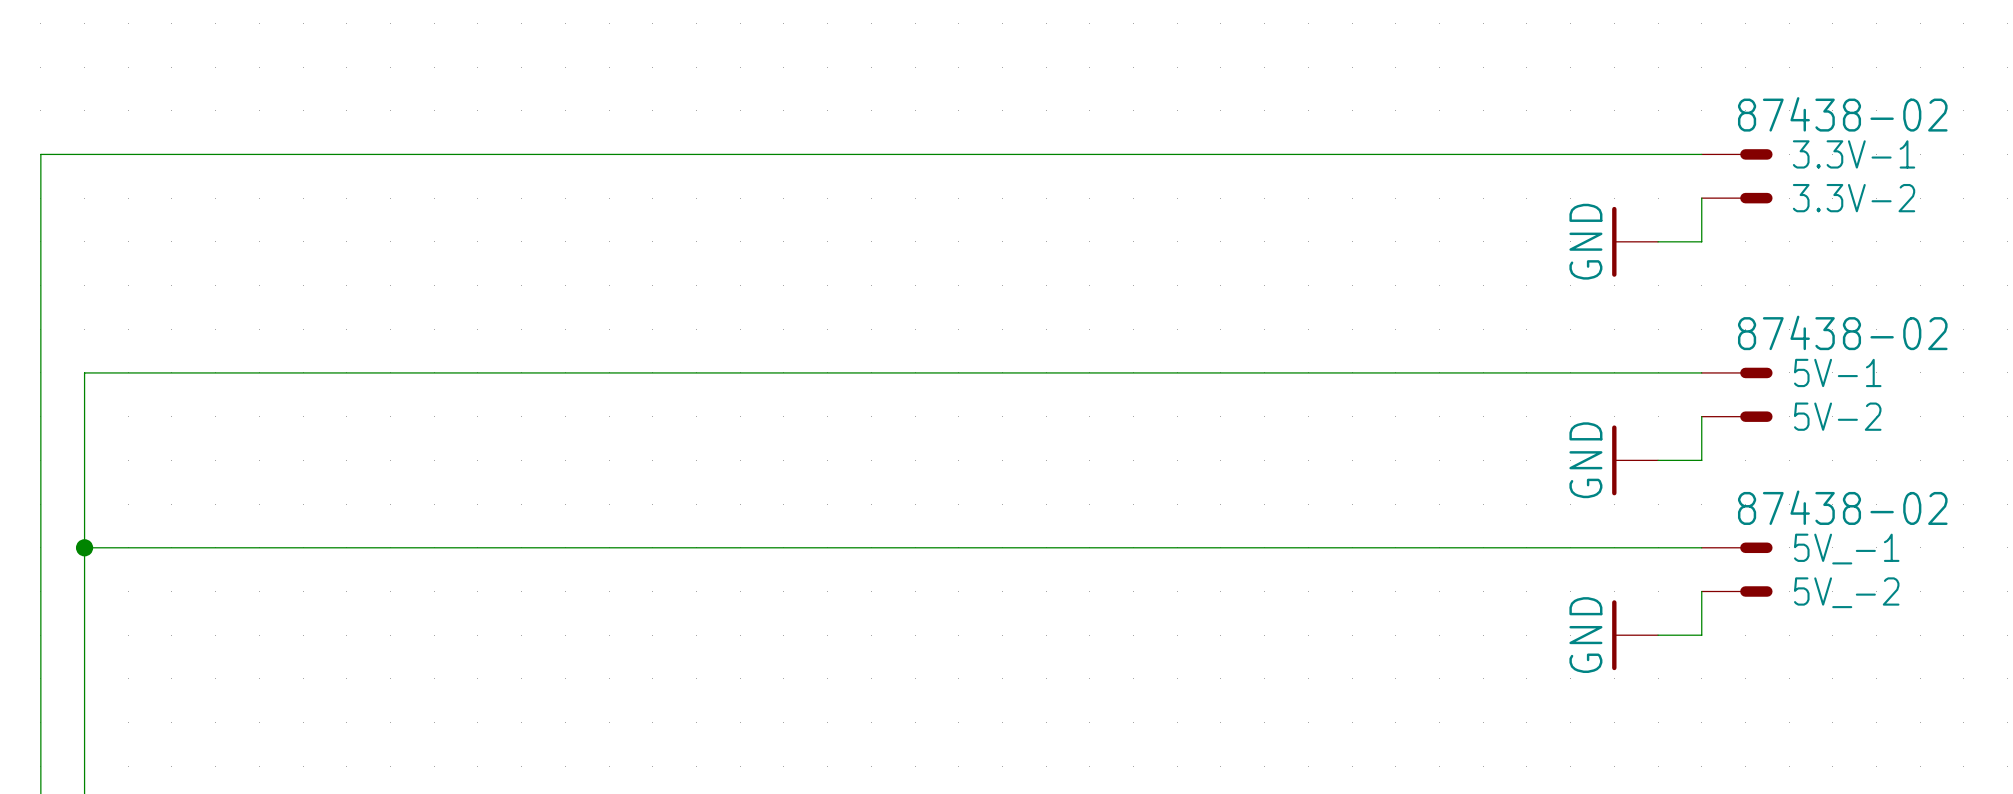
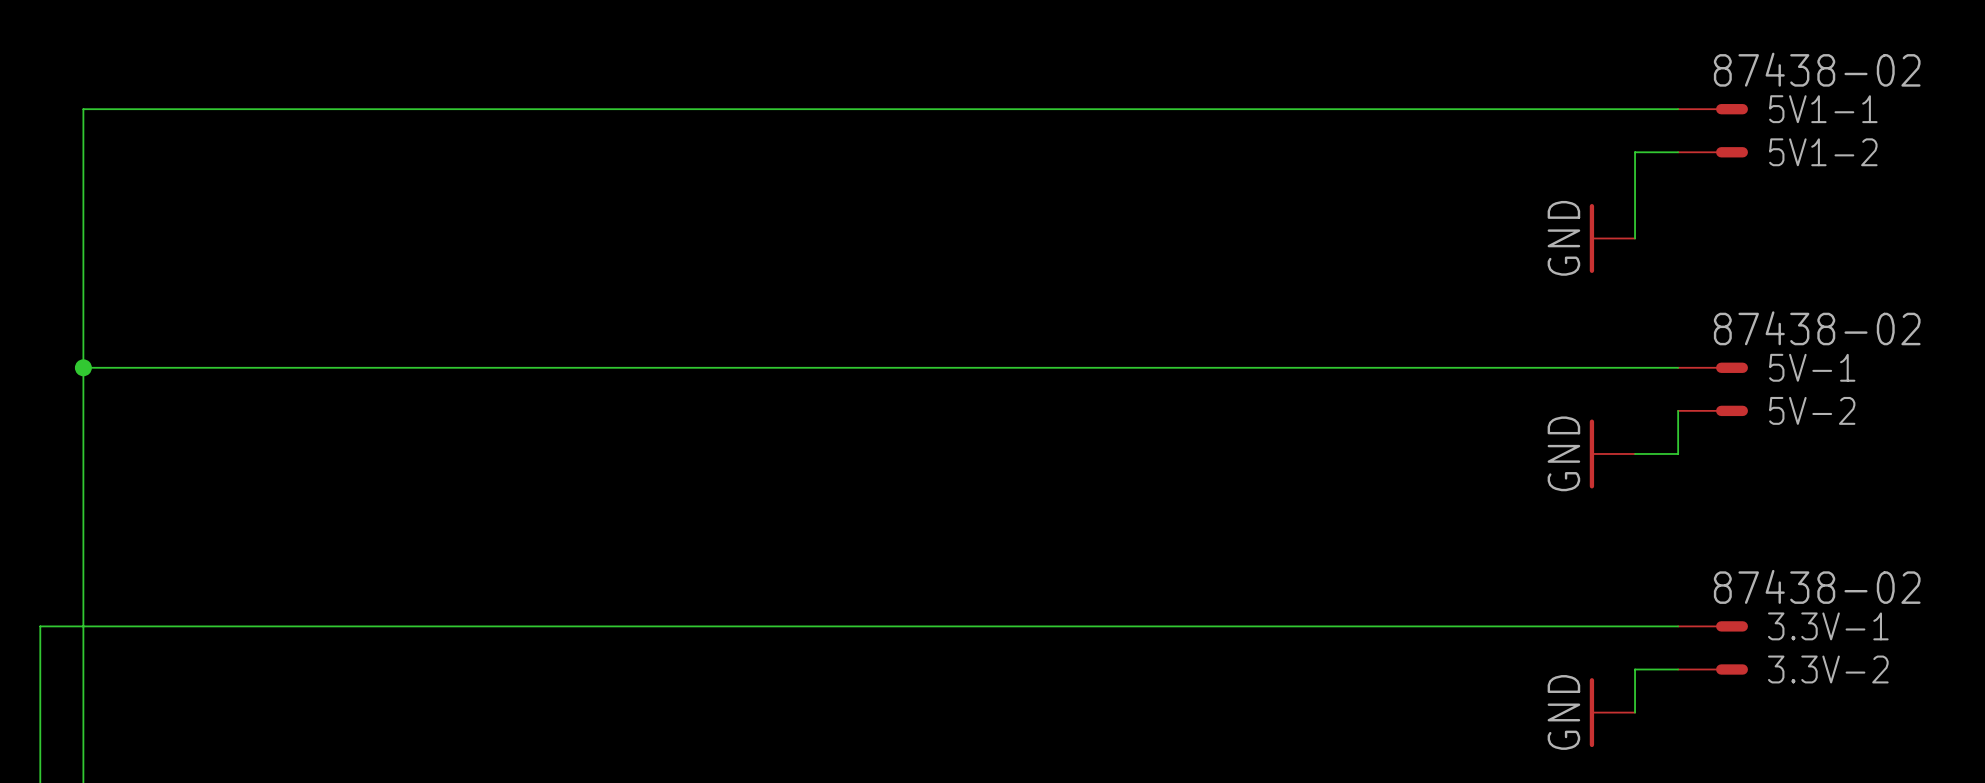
wire: none -> (1678, 109) (83, 109) (83, 367)
5V1-1: none -> 87438-02 (1713, 109)
3.3V-1 value: 87438-02 (1842, 114) -> none
wire: (1658, 154) (40, 154) (40, 635) -> (1635, 626) (40, 626)
3.3V-1 name: 3.3V-1 (1854, 154) -> 5V1-2 (1823, 152)
wire: (1701, 198) (1701, 241) (1658, 241) -> (1635, 152) (1635, 238)
3.3V-2 position: (1737, 198) -> (1713, 669)
junction: none -> (83, 367)
wire: (84, 547) (1701, 547) -> none
junction: (84, 547) -> none
5V_-1: 87438-02 (1737, 547) -> none
wire: (1701, 591) (1701, 635) -> none
5V_-2: (1737, 591) -> none
power symbol position: GND (1635, 635) -> GND (1612, 712)
3.3V-1: none -> 87438-02 (1713, 626)
wire: none -> (1678, 669) (1635, 669) (1635, 712)

